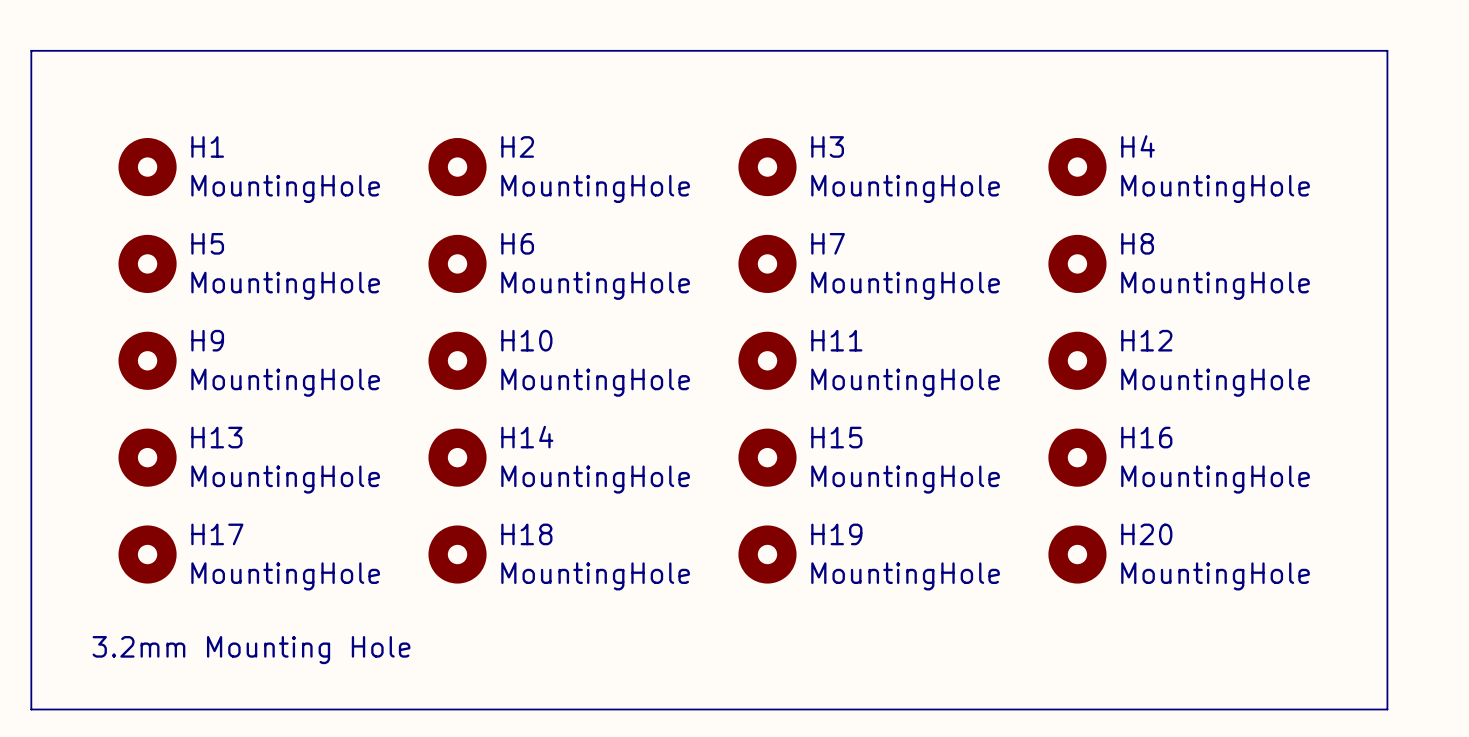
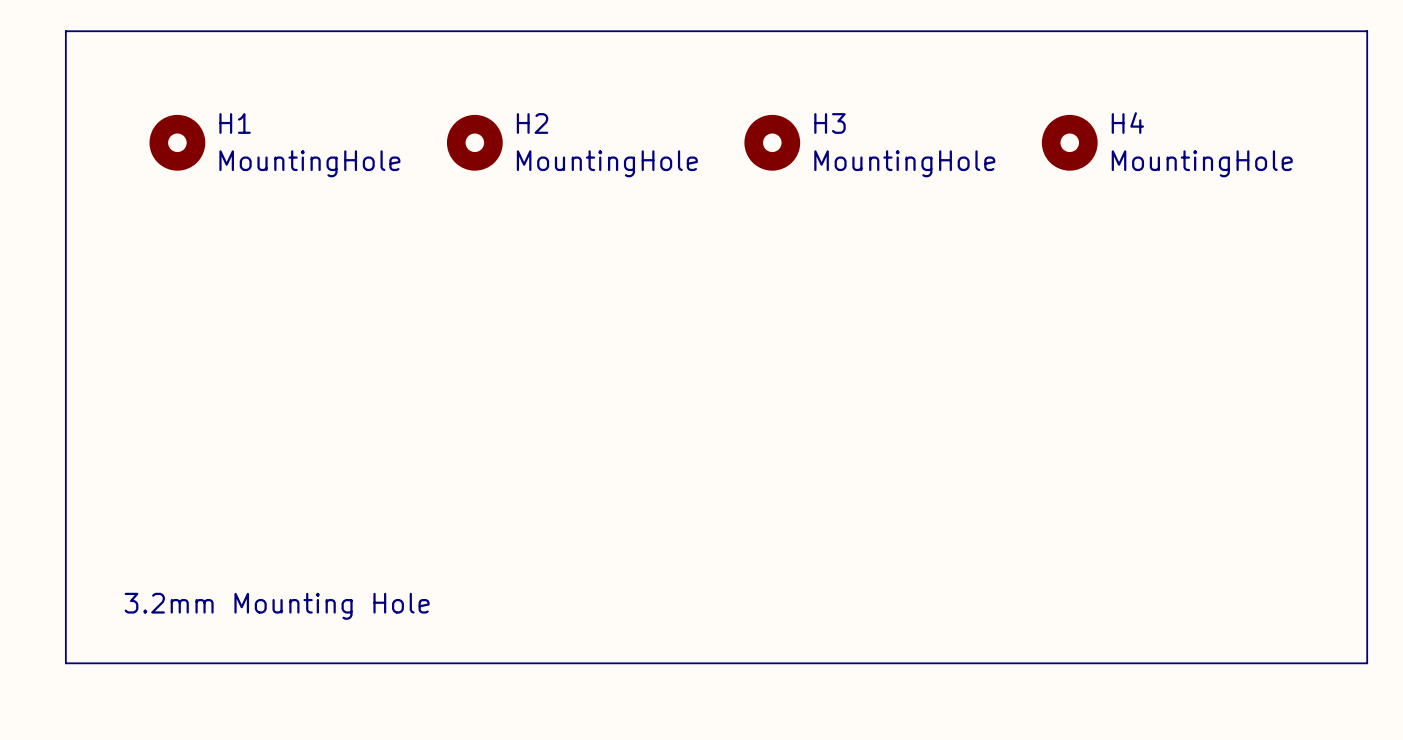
H5: MountingHole (147, 263) -> none
H6: MountingHole (457, 263) -> none
H7: MountingHole (767, 263) -> none
H8: MountingHole (1077, 263) -> none
H9: MountingHole (147, 360) -> none
H10: MountingHole (457, 360) -> none
H11: MountingHole (767, 360) -> none
H12: MountingHole (1077, 360) -> none
H13: MountingHole (147, 457) -> none
H14: MountingHole (457, 457) -> none
H15: MountingHole (767, 457) -> none
H16: MountingHole (1077, 457) -> none
H17: MountingHole (147, 554) -> none
H18: MountingHole (457, 554) -> none
H19: MountingHole (767, 554) -> none
H20: MountingHole (1077, 554) -> none

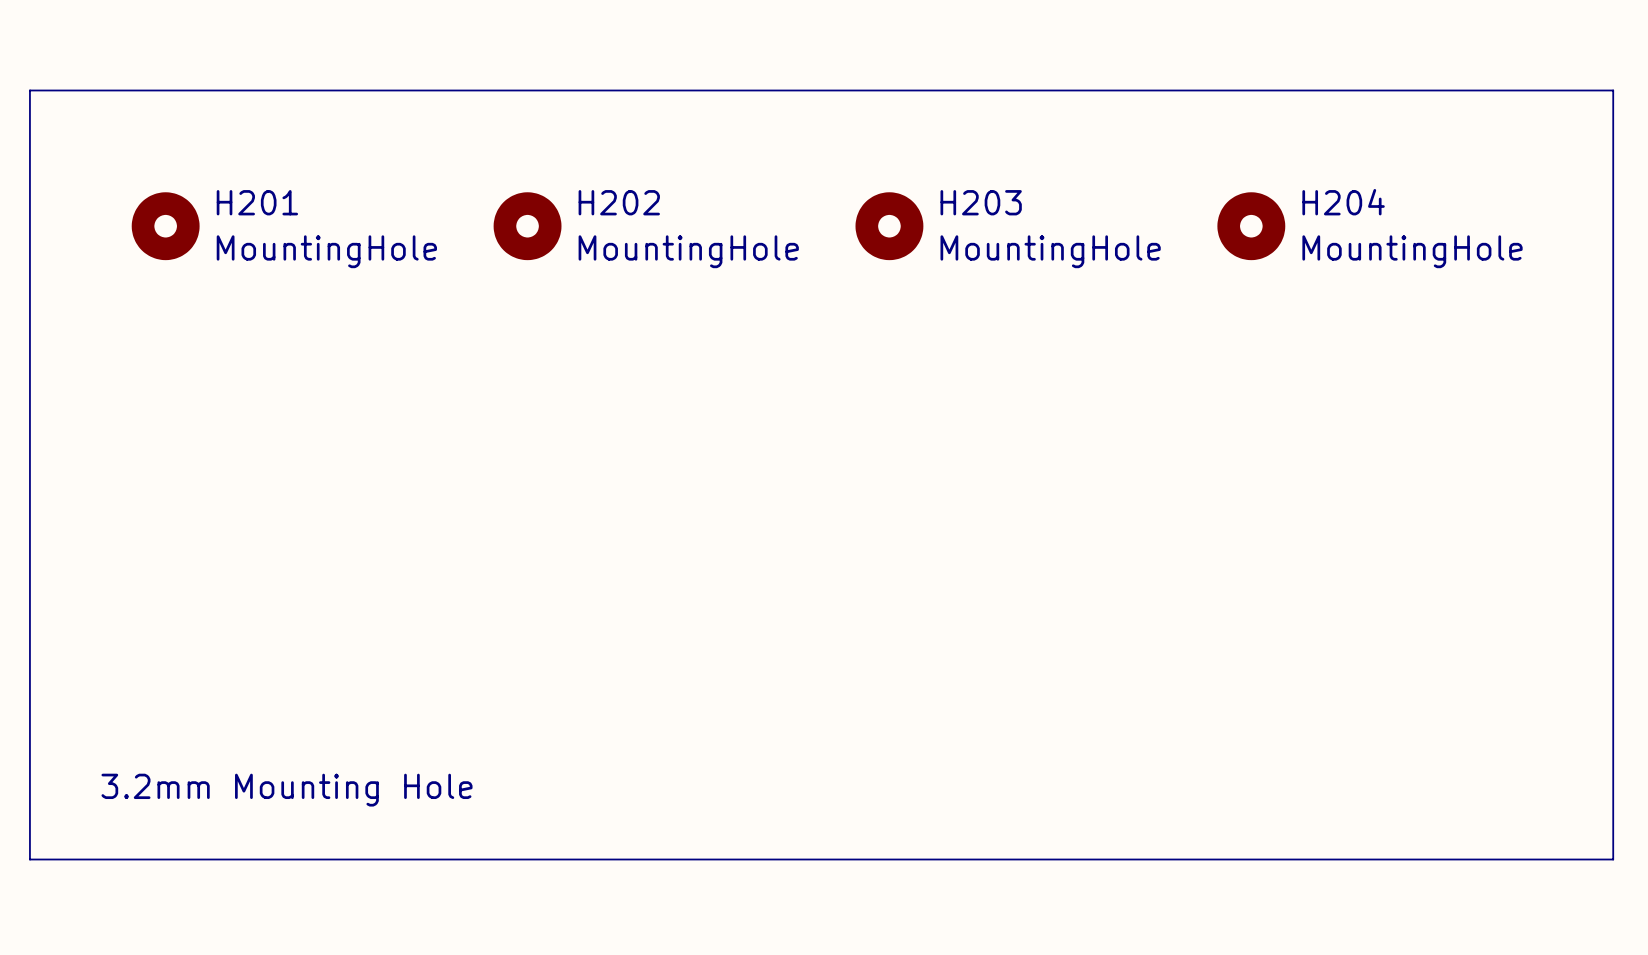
H1 name: H1 (235, 123) -> H201 (257, 202)
H2 name: H2 (532, 123) -> H202 (619, 202)
H3 name: H3 (829, 123) -> H203 (981, 202)
H4 name: H4 (1127, 123) -> H204 (1343, 202)

